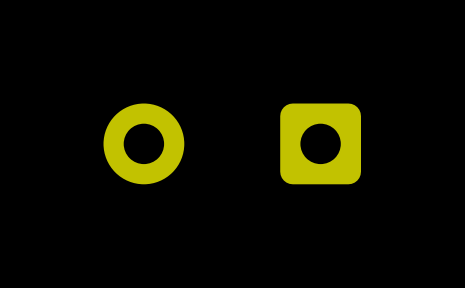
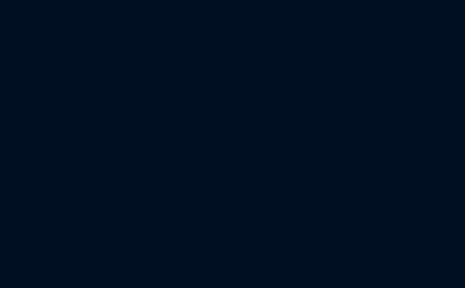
part: (232, 143) -> none

